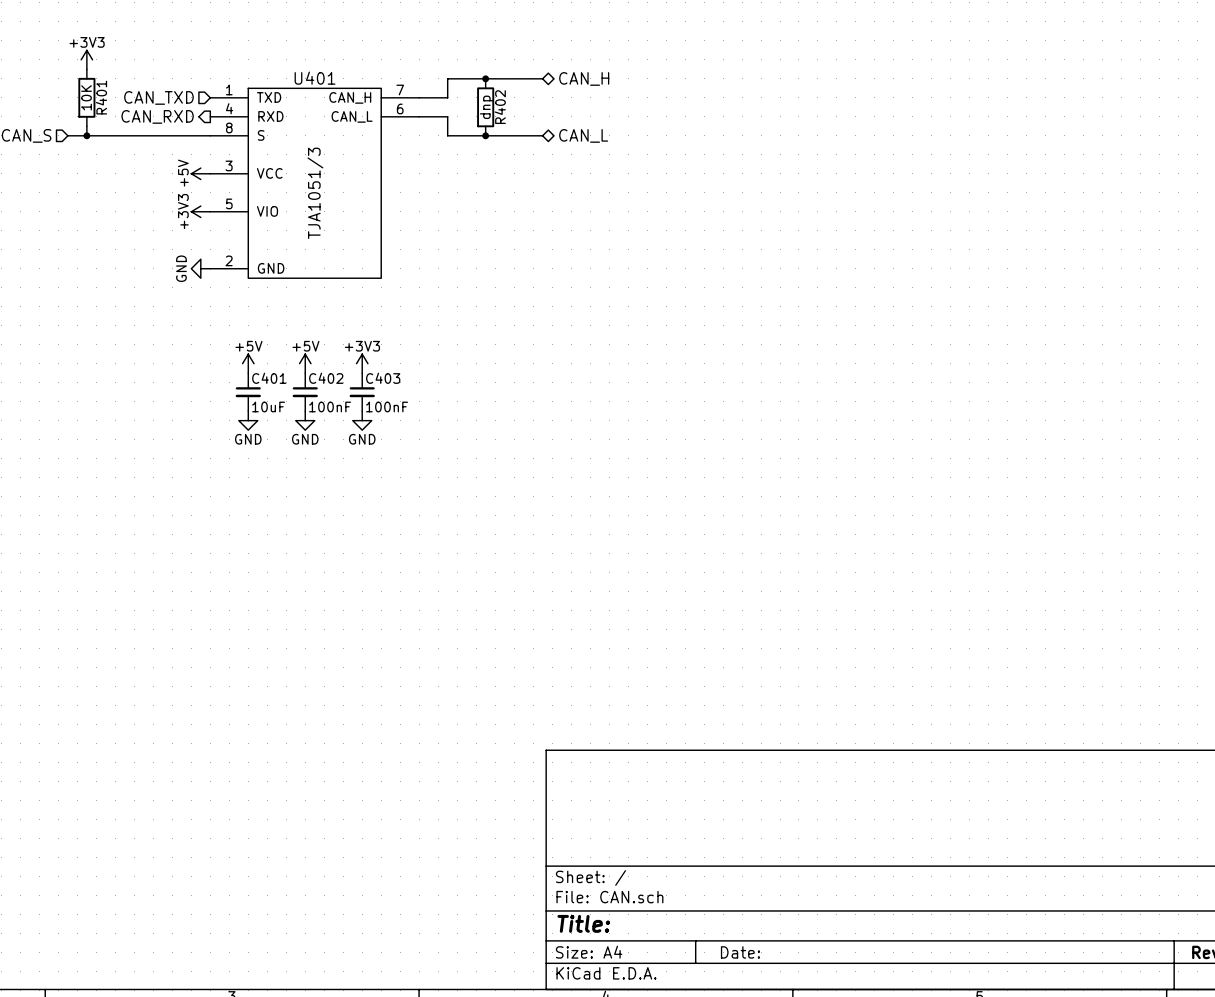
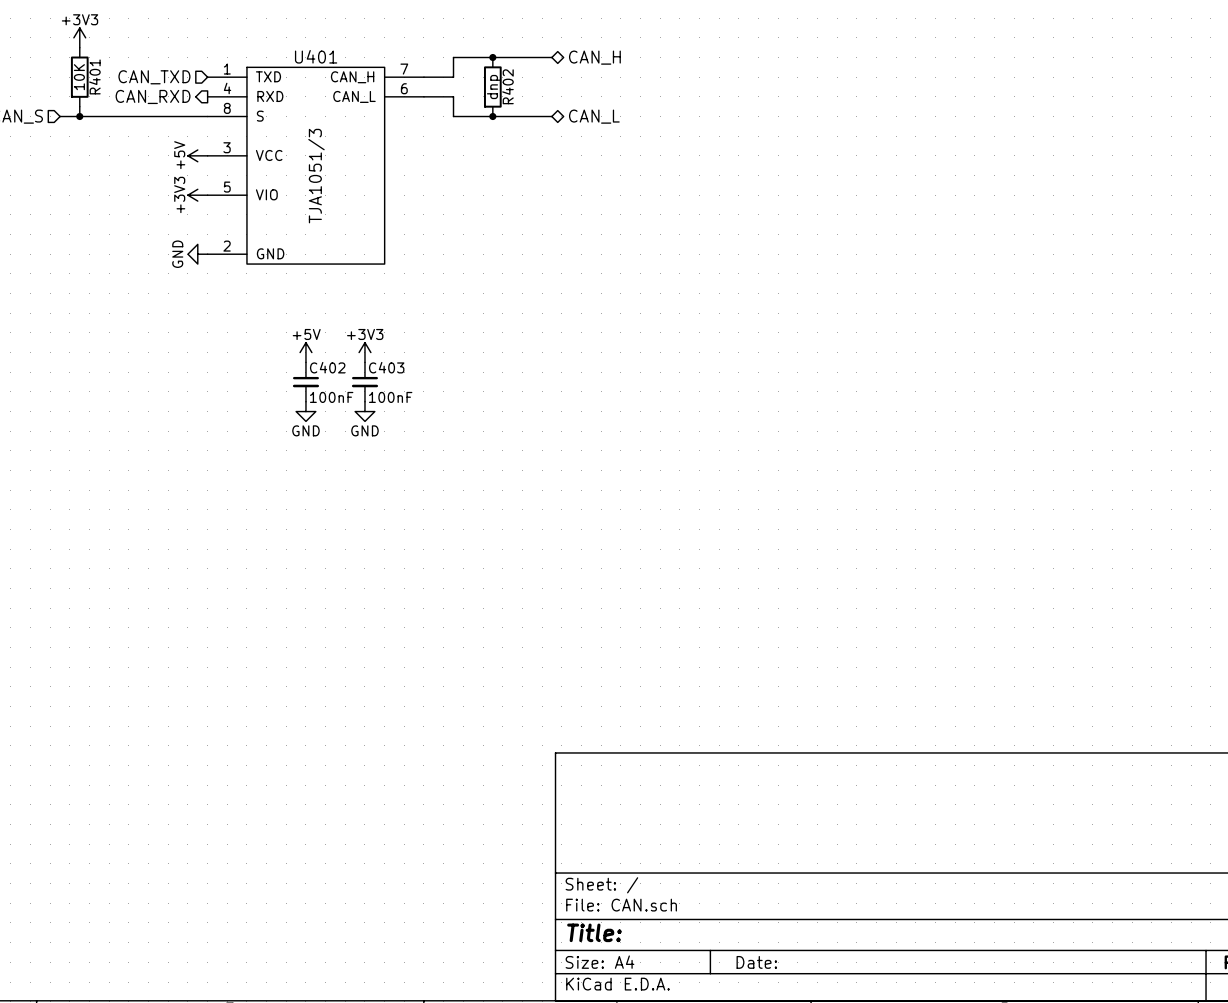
power symbol: +5V (248, 363) -> none
C401: 10uF (248, 392) -> none
power symbol: GND (248, 420) -> none

